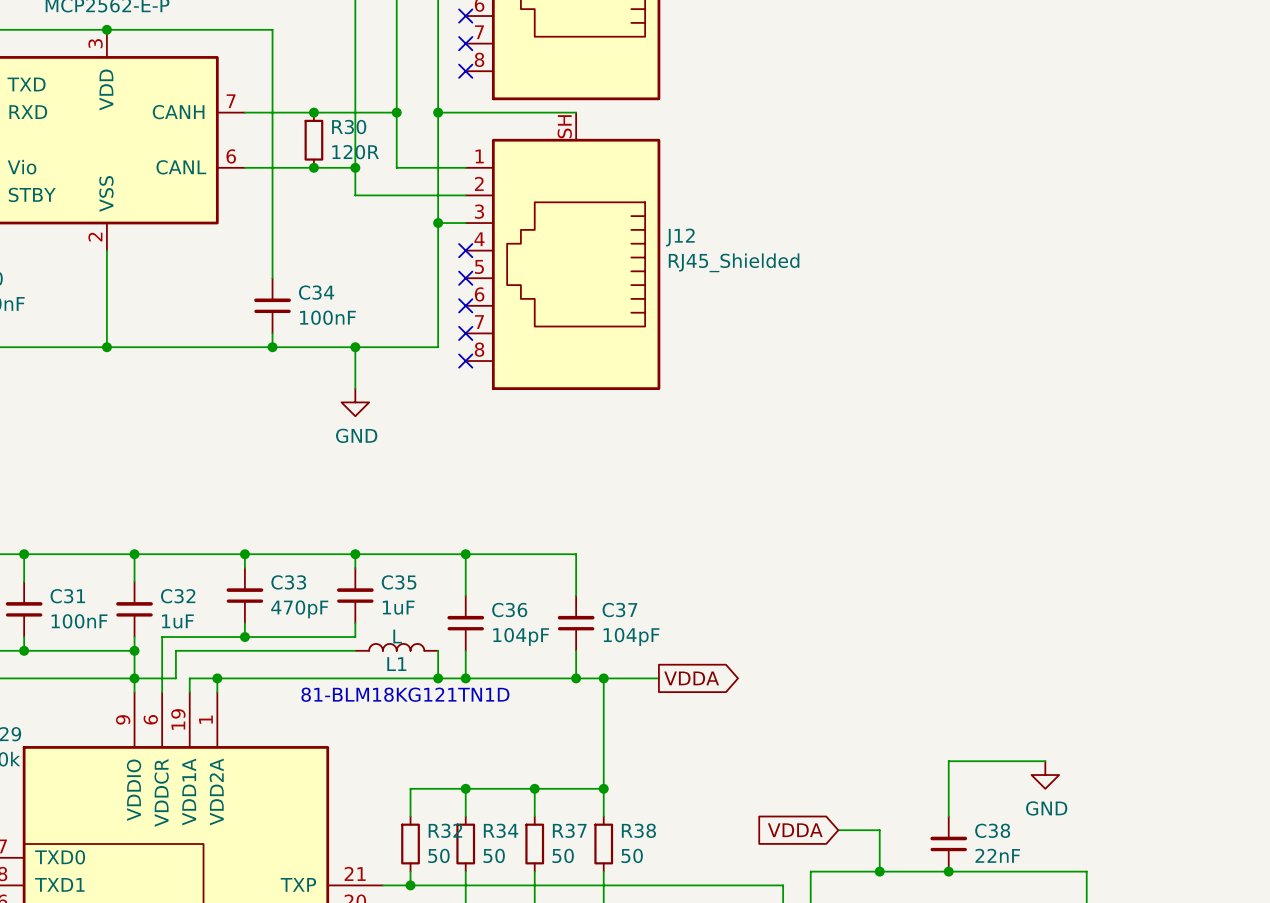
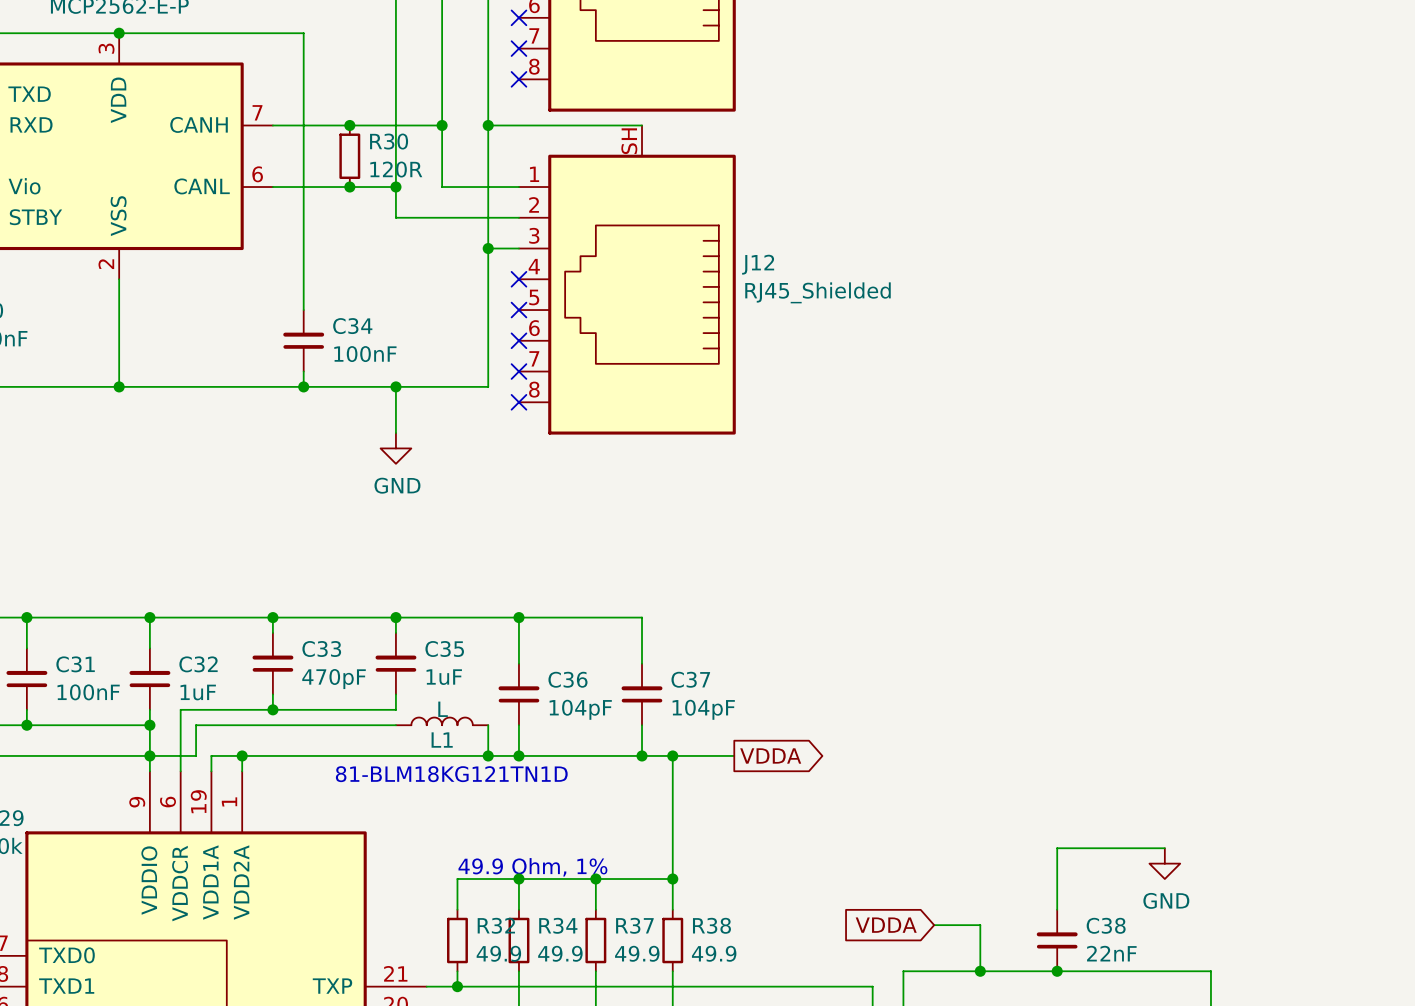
text: none -> 49.9 Ohm, 1% (532, 867)
R32 value: 50 (438, 855) -> 49.9 (498, 953)
R34 value: 50 (494, 855) -> 49.9 (560, 953)
R37 value: 50 (563, 855) -> 49.9 (637, 953)
R38 value: 50 (632, 855) -> 49.9 (714, 953)

